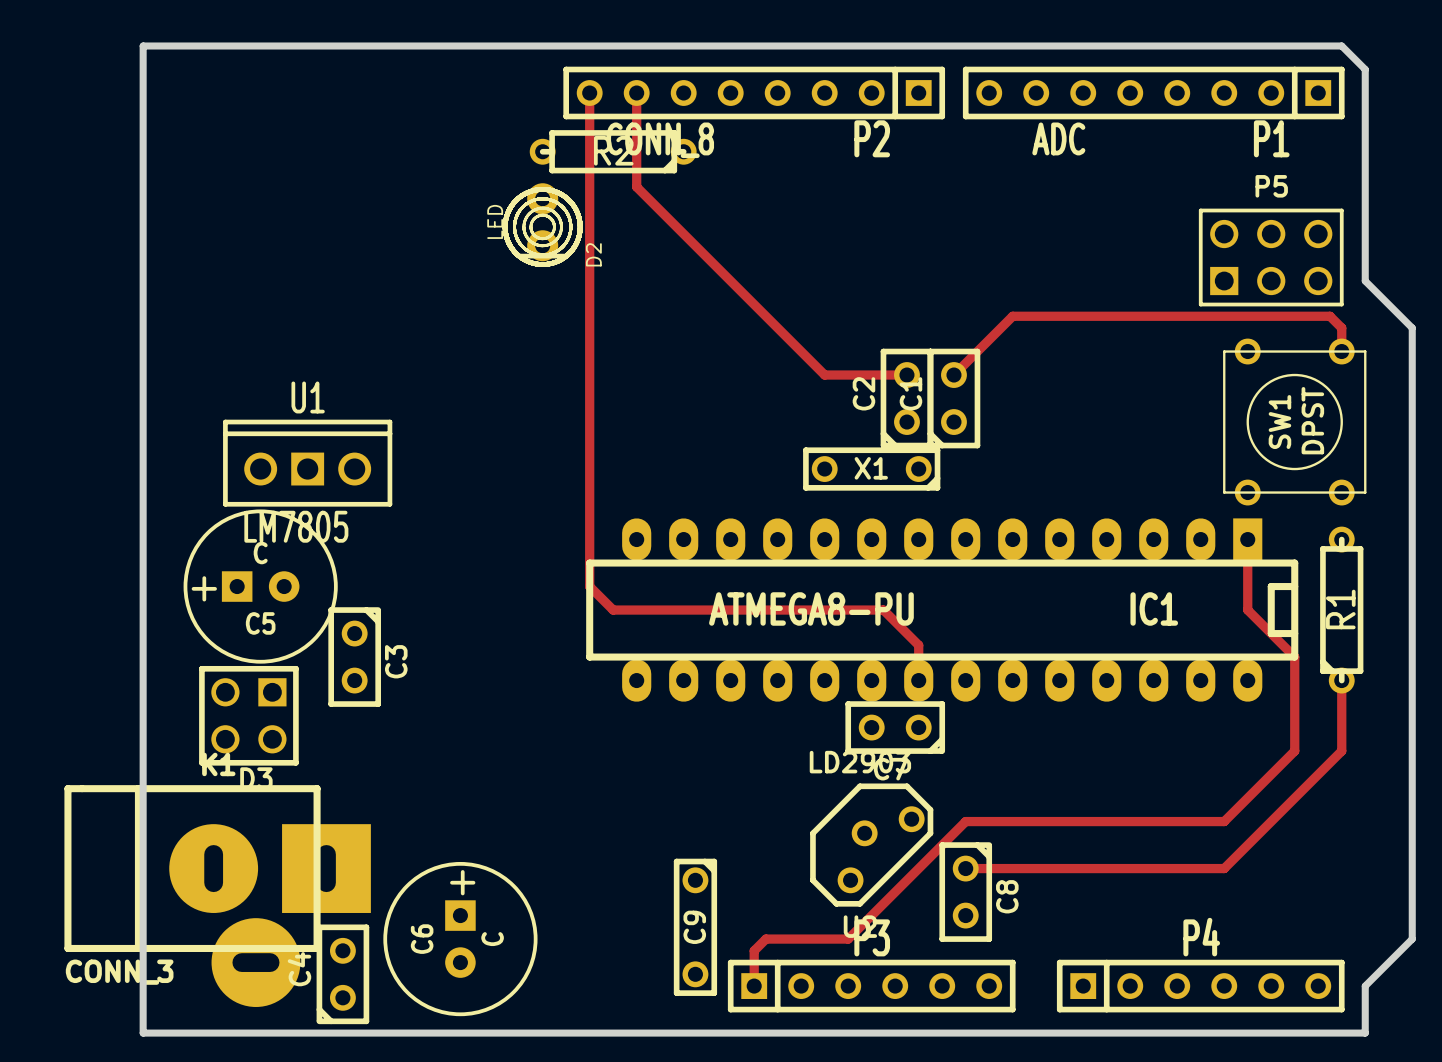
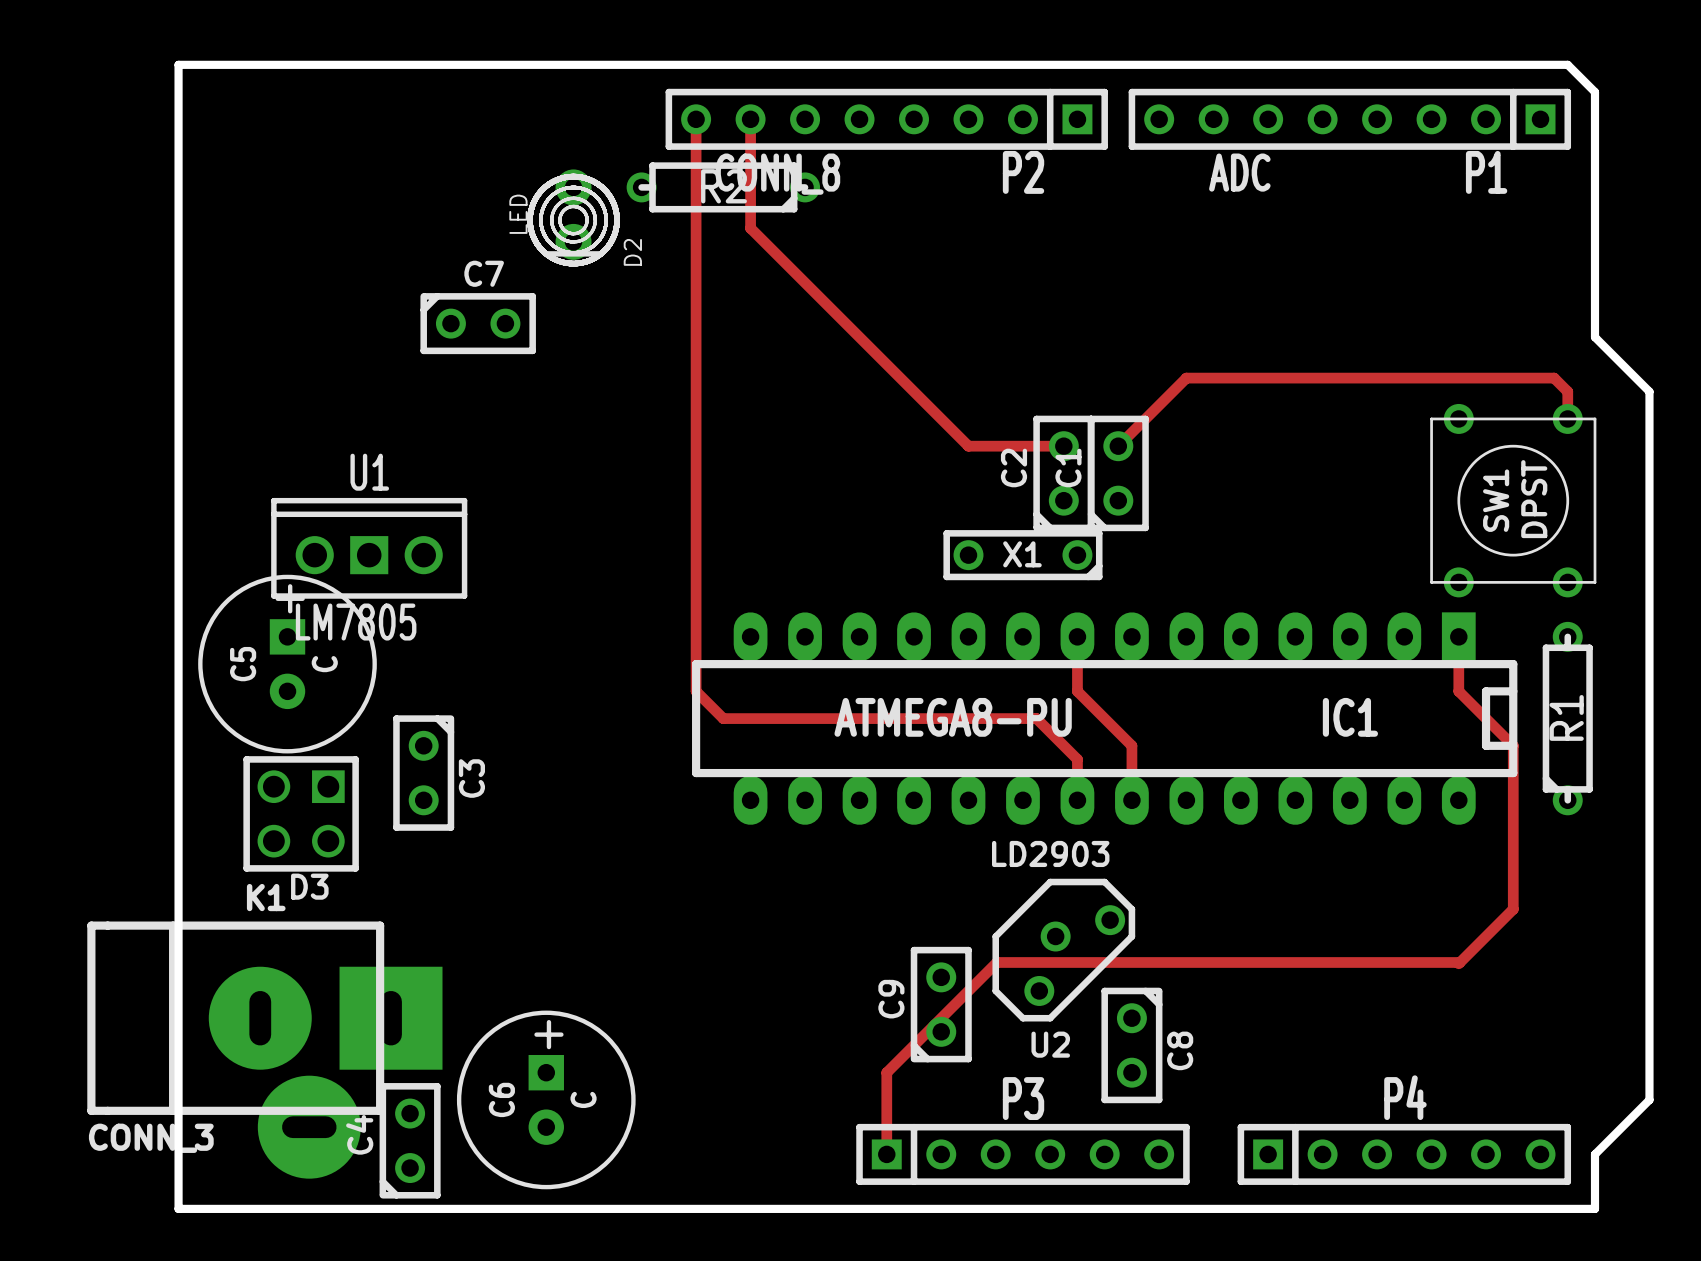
D2 position: (542, 225) -> (573, 217)
P5: (1271, 257) -> none
track: none -> (1077, 636) (1077, 691) (1131, 745) (1131, 800)
C5 rotation: 0° (260, 586) -> 90° clockwise (287, 664)
track: (1247, 586) (1247, 610) (1294, 657) -> (1458, 691) (1513, 745) (1513, 773)
track: (1341, 680) (1341, 751) (1224, 868) (965, 868) -> none
D3 position: (248, 715) -> (301, 813)
C7 rotation: 0° (895, 727) -> 180° (478, 323)
C7 position: (895, 727) -> (478, 323)
track: (1294, 751) (1224, 821) (965, 821) (848, 939) (765, 939) (754, 950) -> (1459, 962) (996, 962) (886, 1072) (886, 1113)
track: none -> (1513, 882) (1513, 909) (1458, 963)
U2 position: (871, 845) -> (1063, 950)
C9 footprint: [673, 858, 718, 996] -> [910, 946, 972, 1063]
C9 name position: C9 (694, 927) -> C9 (891, 999)

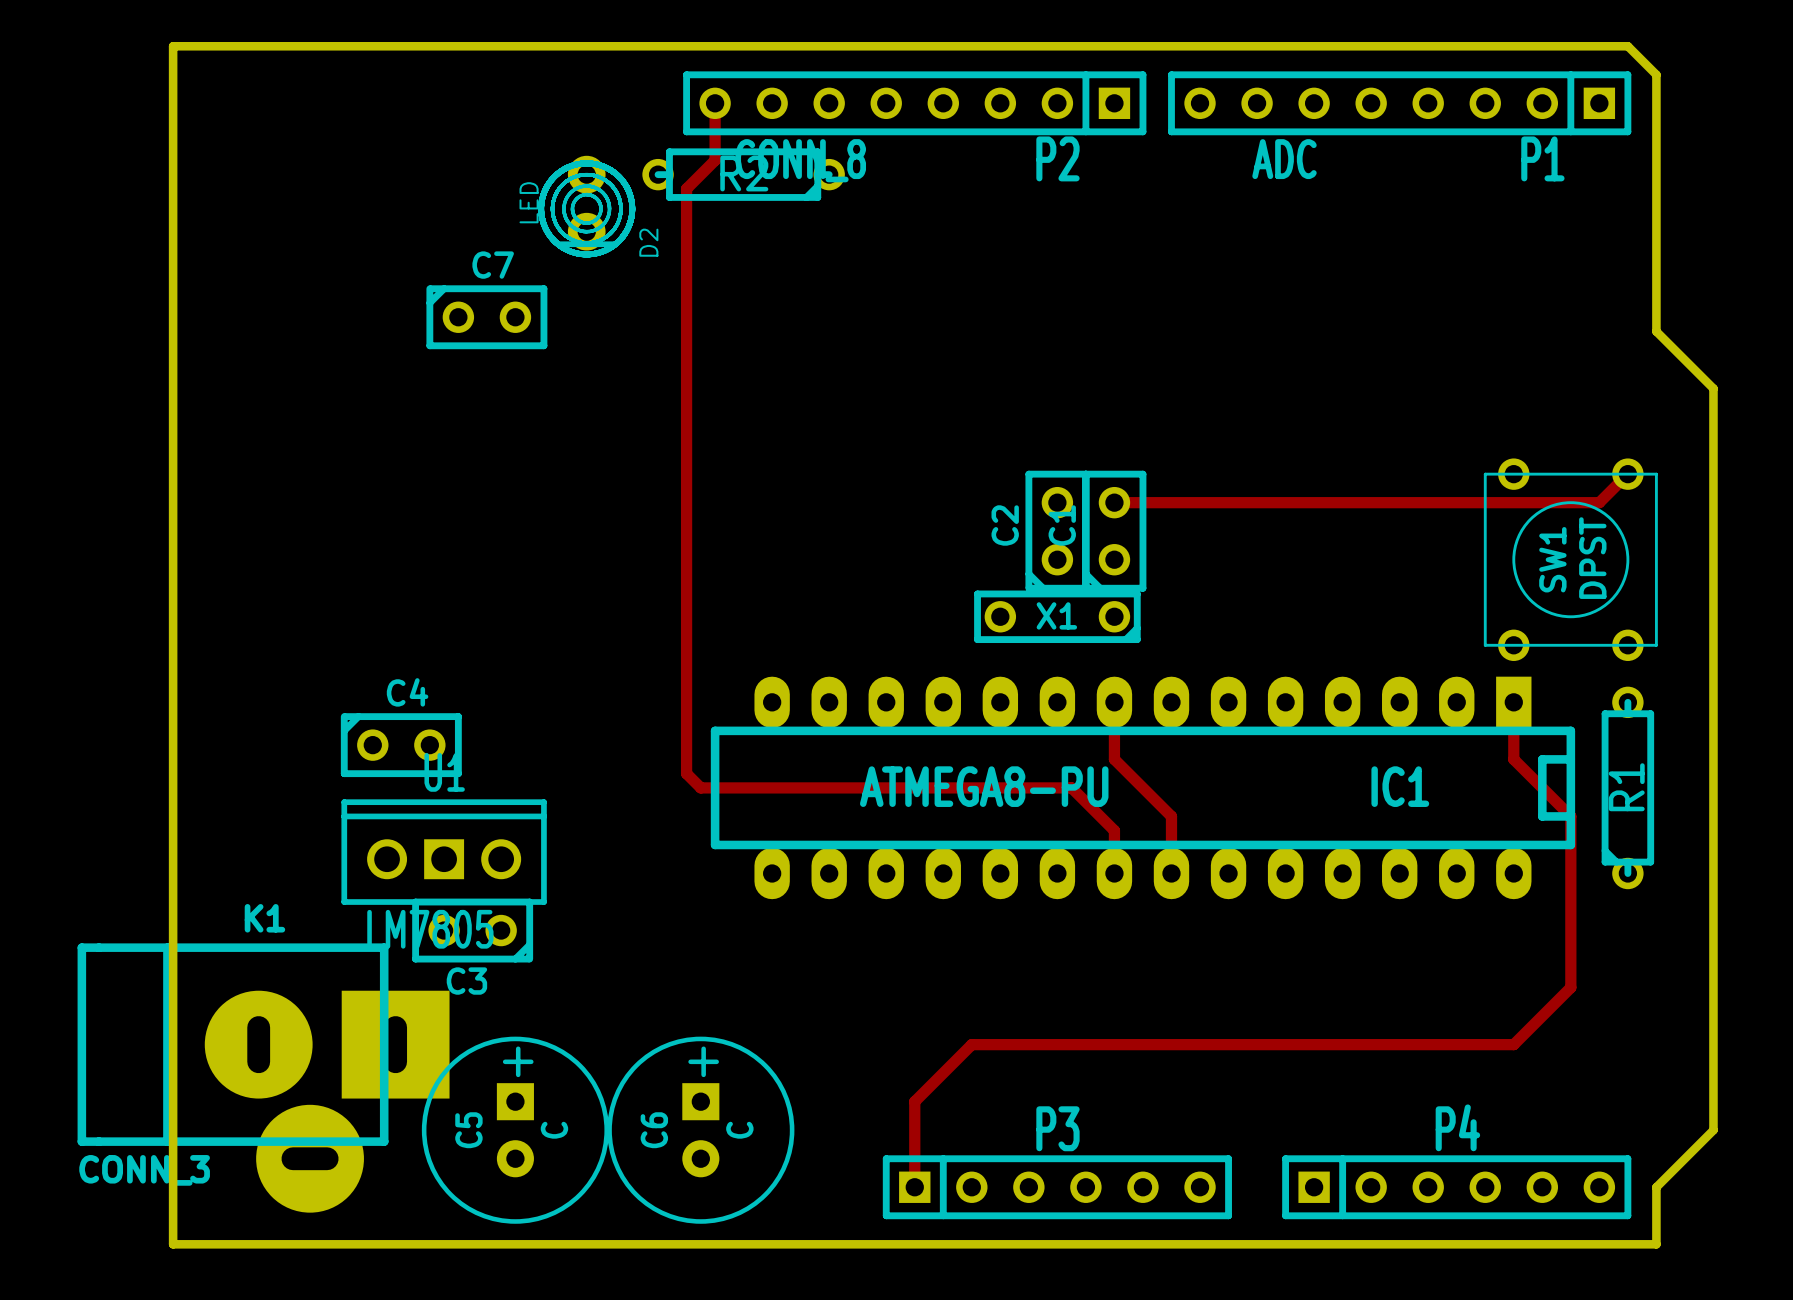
track: (750, 119) (750, 228) (968, 446) (1063, 446) -> none
track: (696, 173) (696, 691) (723, 718) (1036, 718) (1077, 759) (1077, 800) -> (715, 160) (686, 188) (686, 773) (700, 787) (1071, 787) (1114, 830) (1114, 873)
track: (1567, 418) (1567, 391) (1554, 378) (1186, 378) (1118, 446) -> none
C2 position: (1063, 473) -> (1057, 531)
C1 position: (1118, 473) -> (1114, 531)
track: none -> (1627, 474) (1599, 502) (1114, 502)
SW1 position: (1513, 500) -> (1570, 559)
U1 position: (369, 548) -> (444, 852)
X1 position: (1022, 555) -> (1057, 616)
track: (1077, 636) (1077, 691) (1131, 745) (1131, 800) -> (1114, 702) (1114, 759) (1171, 816) (1171, 873)
track: (1458, 636) (1458, 691) (1513, 745) (1513, 800) -> (1513, 702) (1513, 759) (1570, 816)
C5 position: (287, 664) -> (515, 1130)
IC1 position: (1104, 718) -> (1142, 787)
R1 position: (1567, 718) -> (1627, 787)
C3 rotation: 0° (423, 773) -> 90° clockwise (472, 930)
C3 position: (423, 773) -> (472, 930)
D3: (301, 813) -> none
track: (1513, 909) (1458, 963) -> none
U2: LD2903 (1063, 950) -> none
track: (1459, 962) (996, 962) (941, 1018) -> (1570, 930) (1570, 987) (1513, 1044) (971, 1044)
C9: (941, 1004) -> none
C8: (1131, 1045) -> none
C6 position: (546, 1099) -> (700, 1130)
C4 rotation: 0° (410, 1140) -> 90° clockwise (401, 745)
C4 position: (410, 1140) -> (401, 745)

